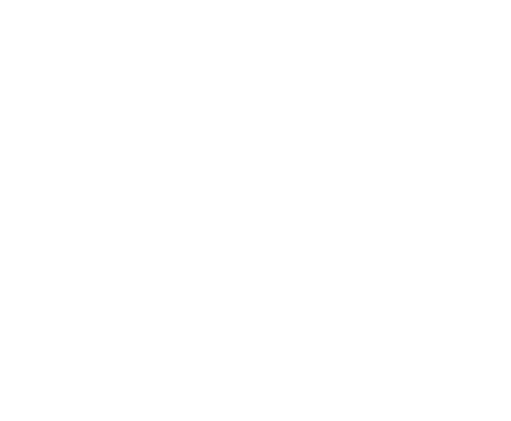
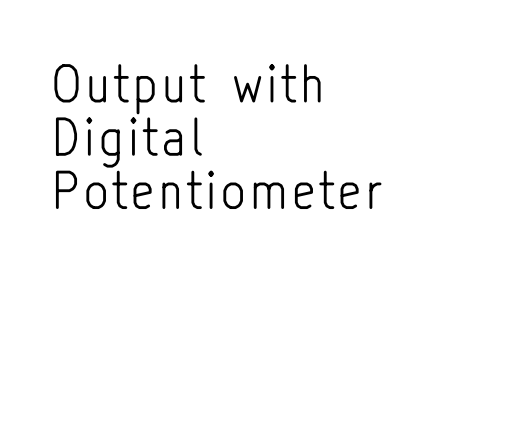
text: none -> Output with (187, 89)
text: none -> Digital (128, 142)
text: none -> Potentiometer (218, 189)

